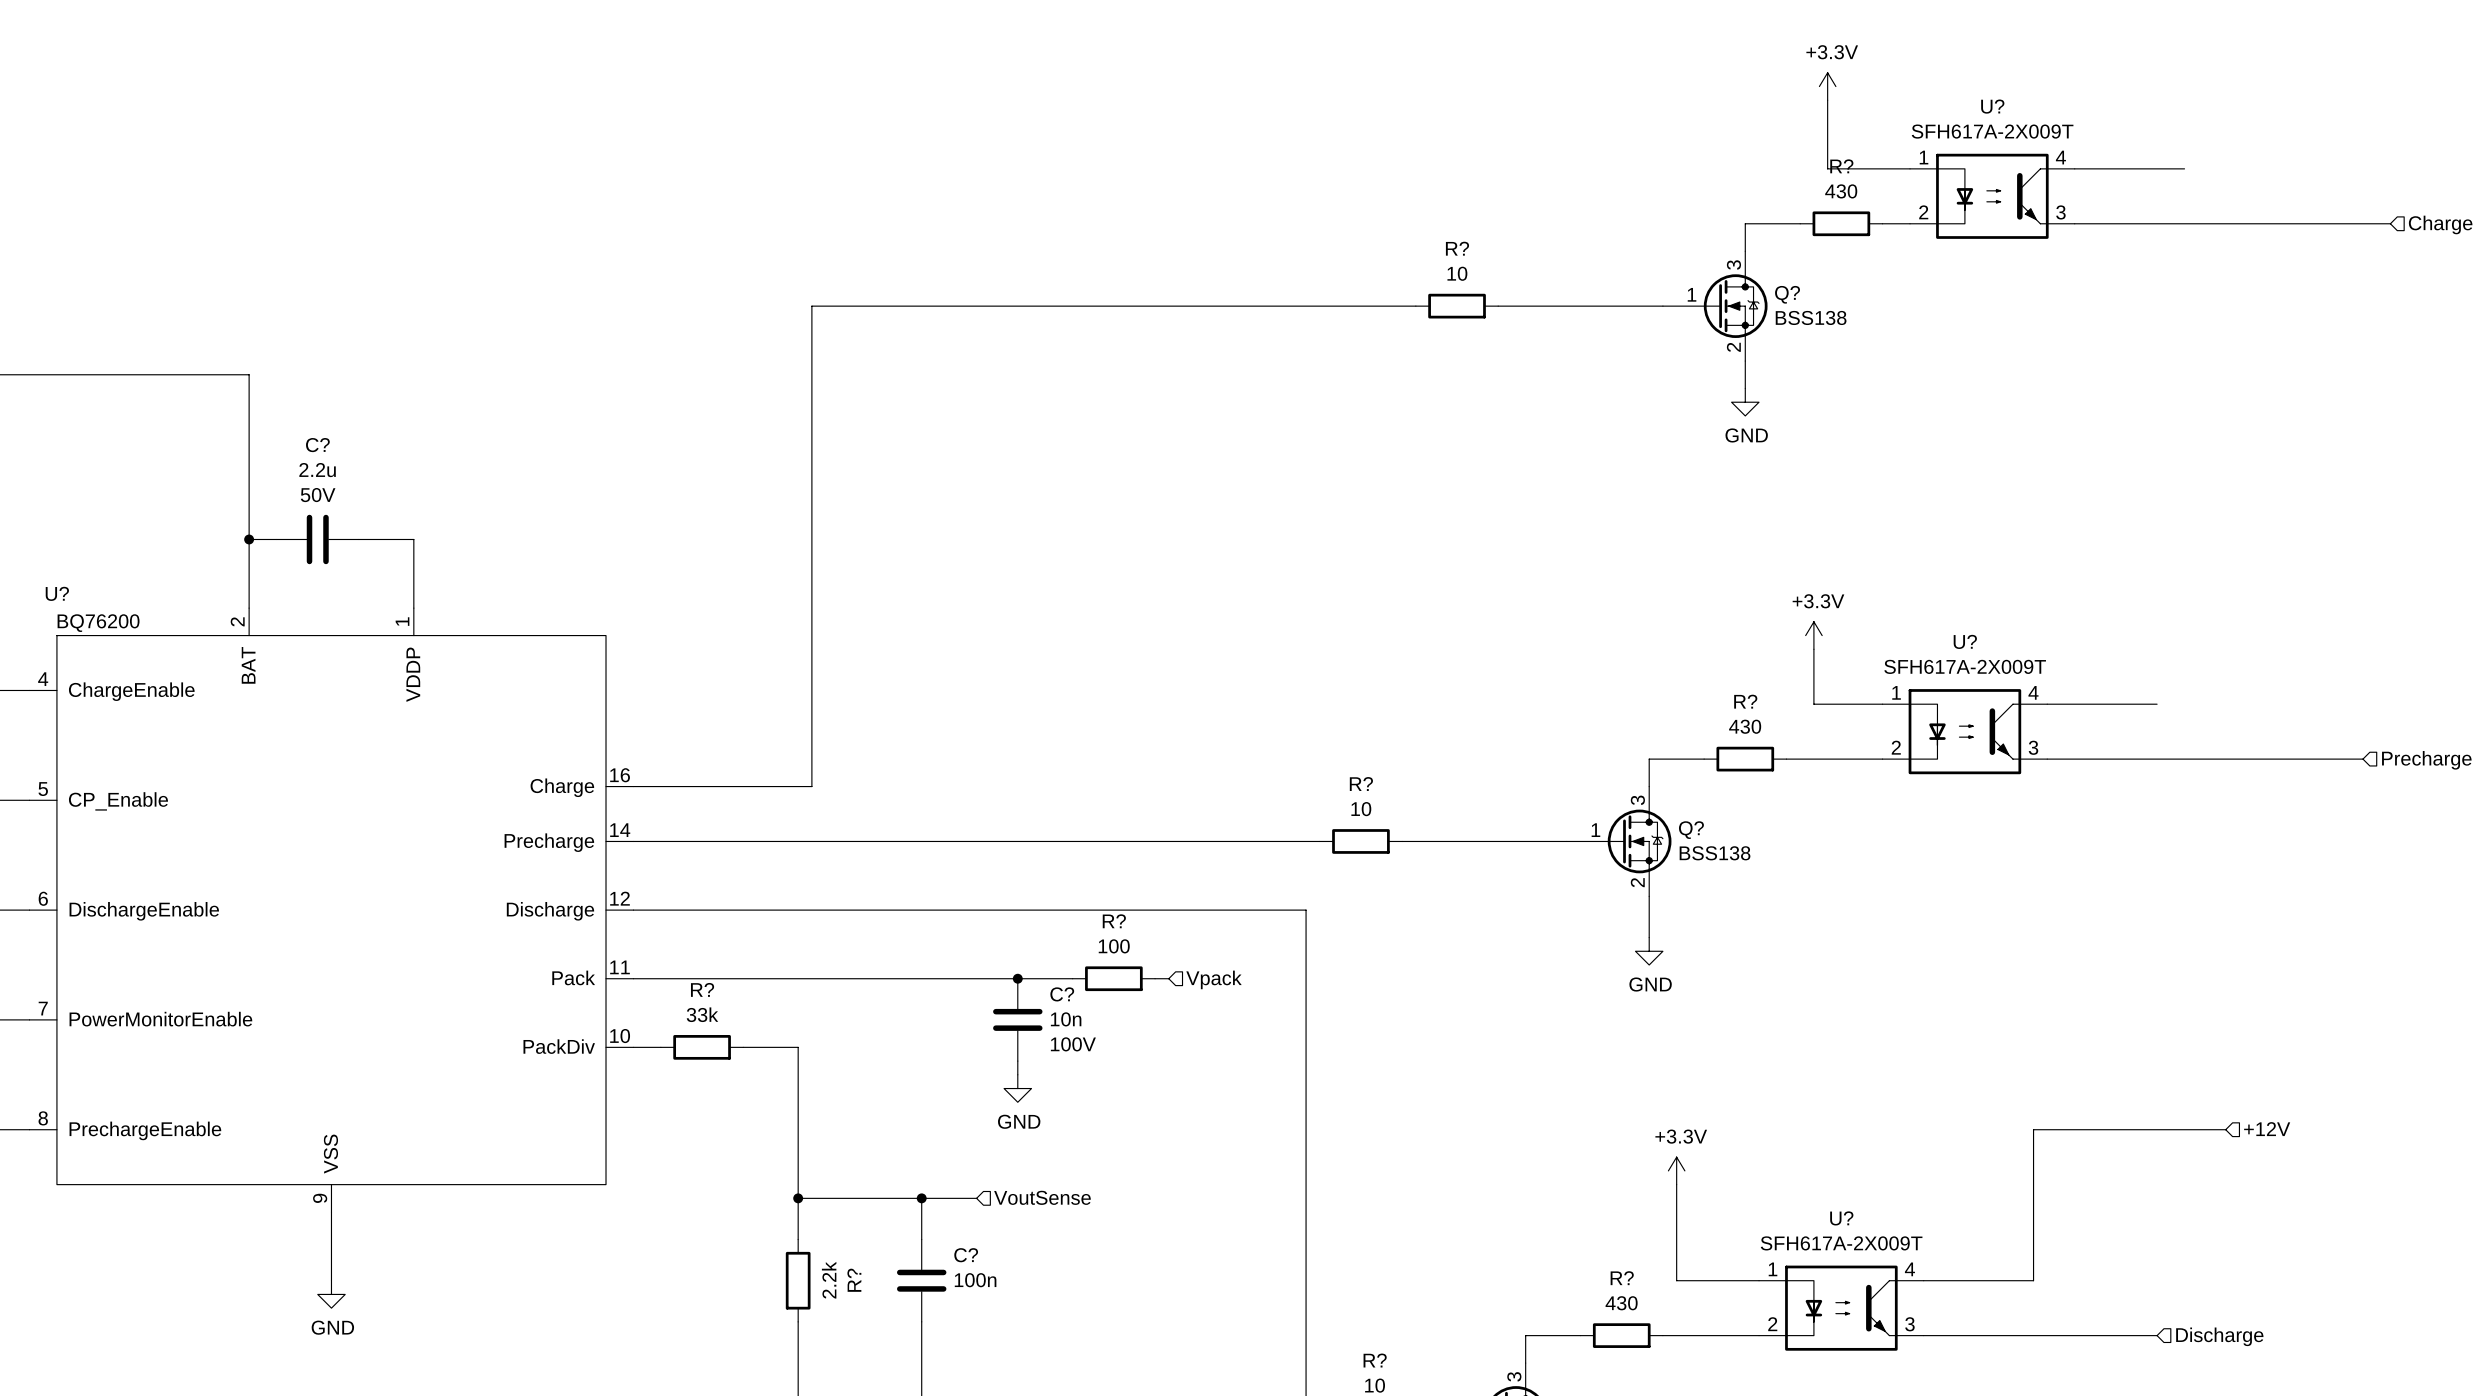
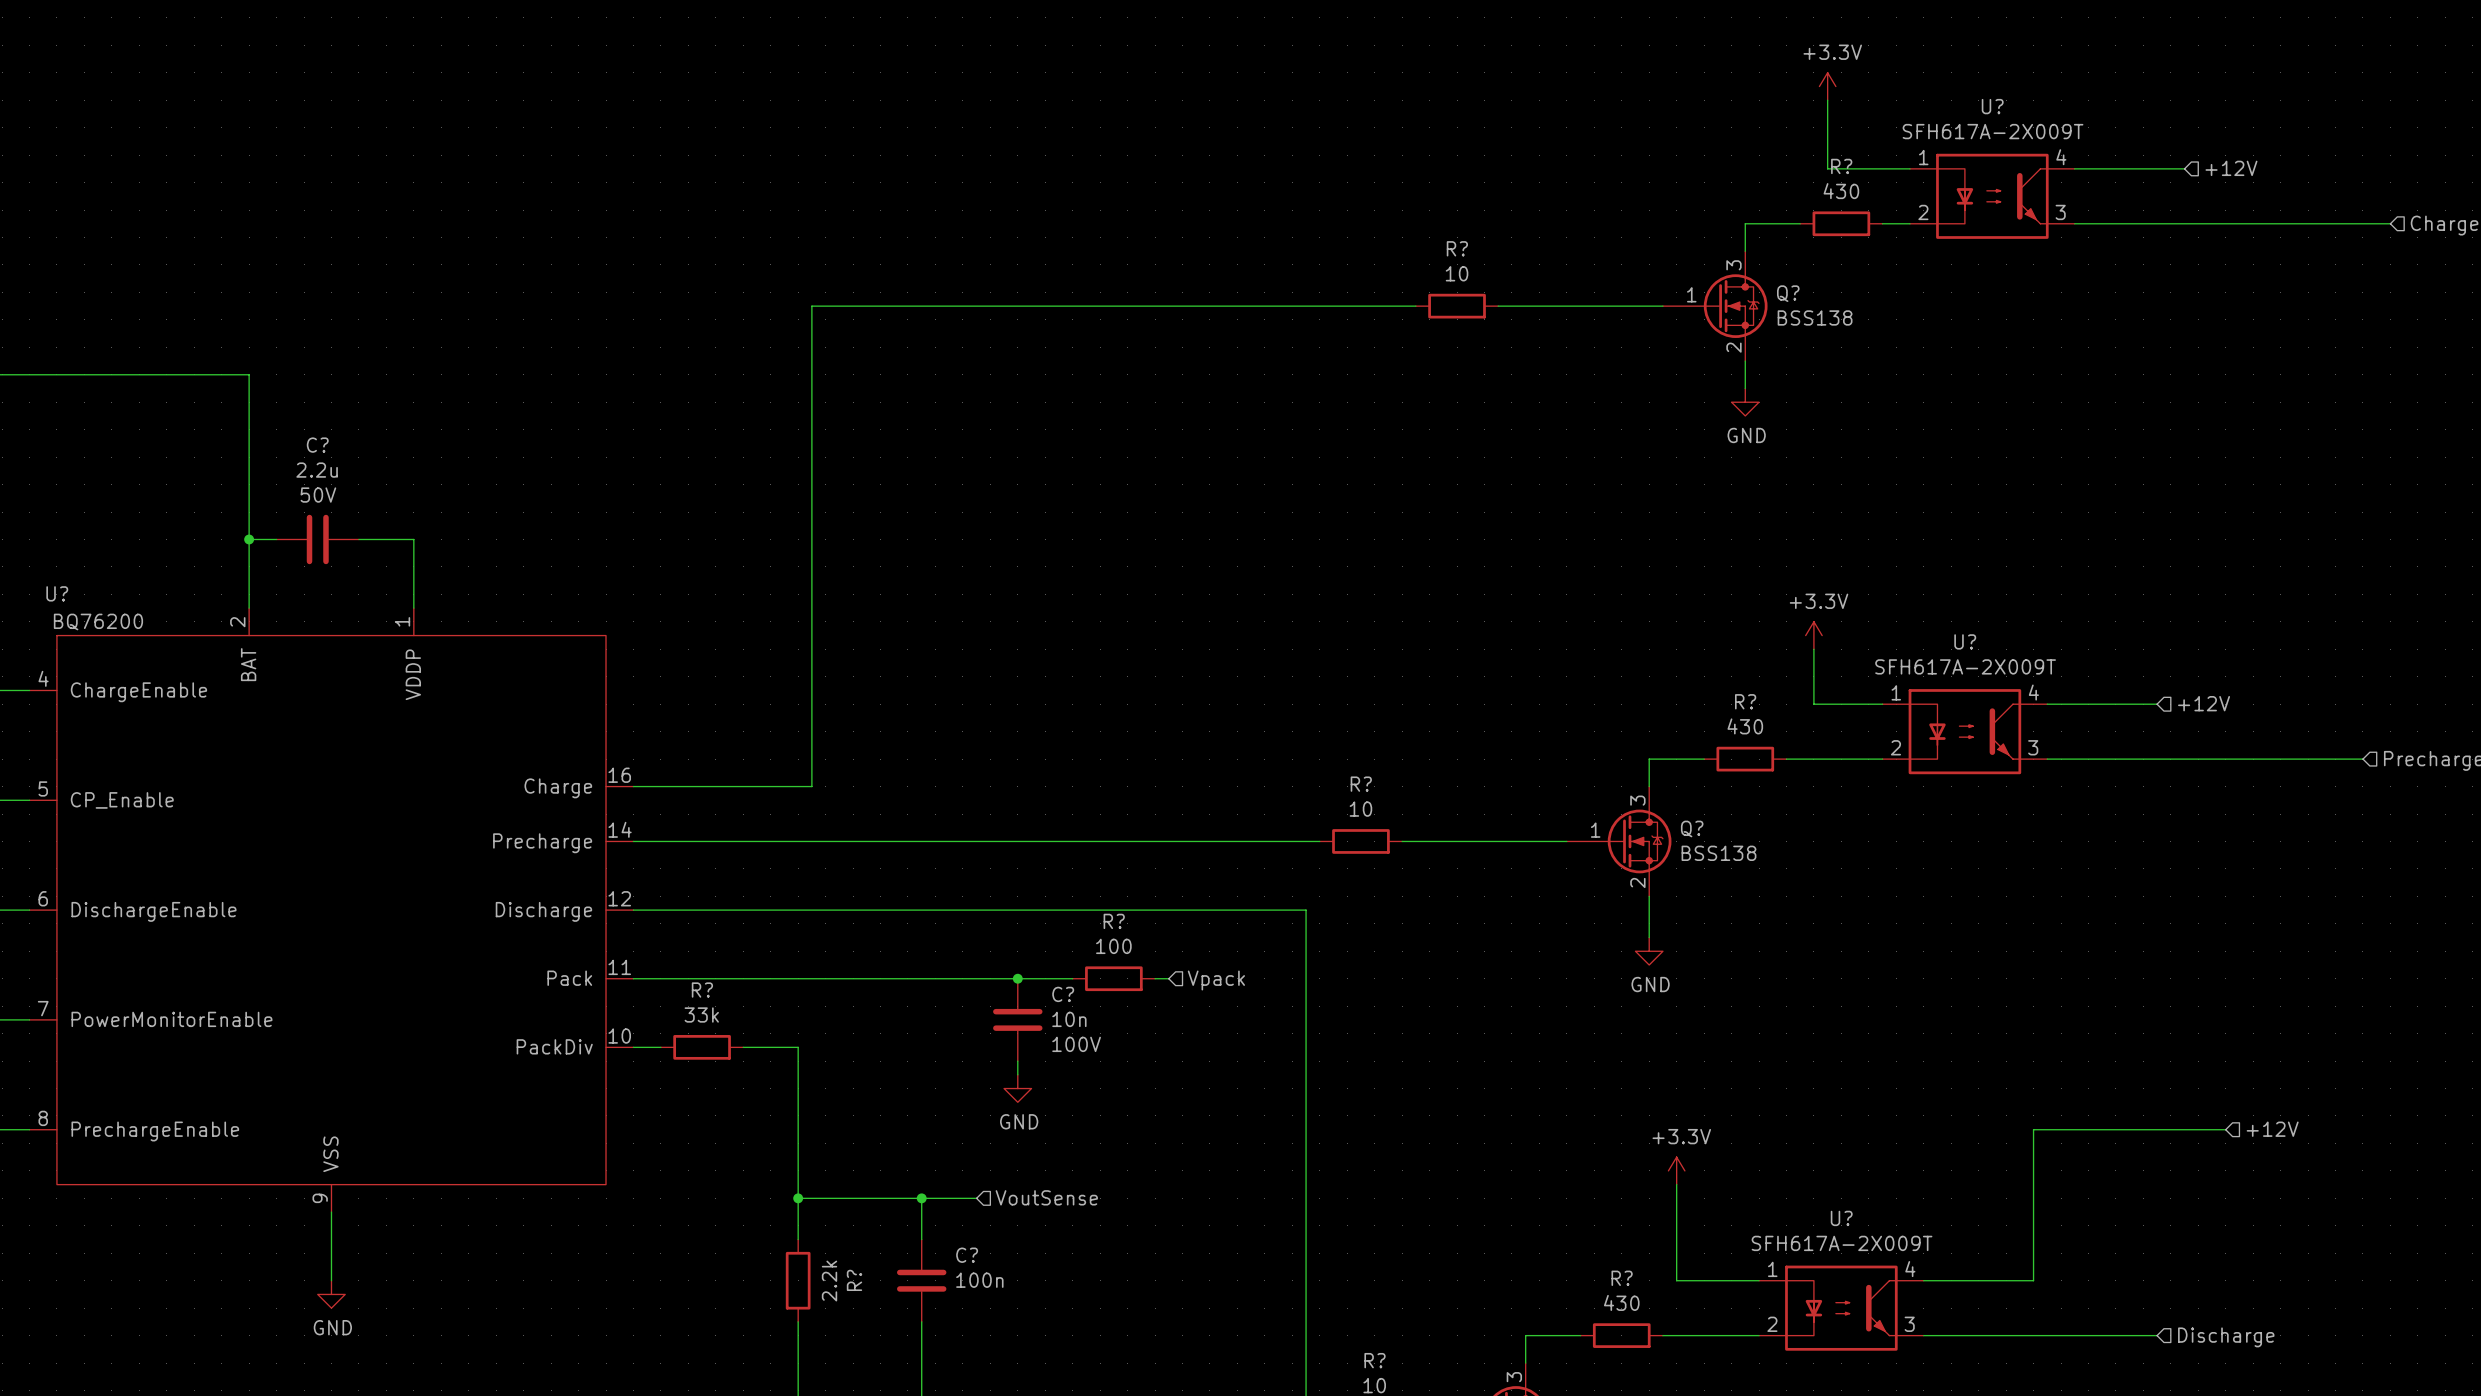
hierarchical label: none -> +12V (2231, 168)
hierarchical label: none -> +12V (2204, 703)

